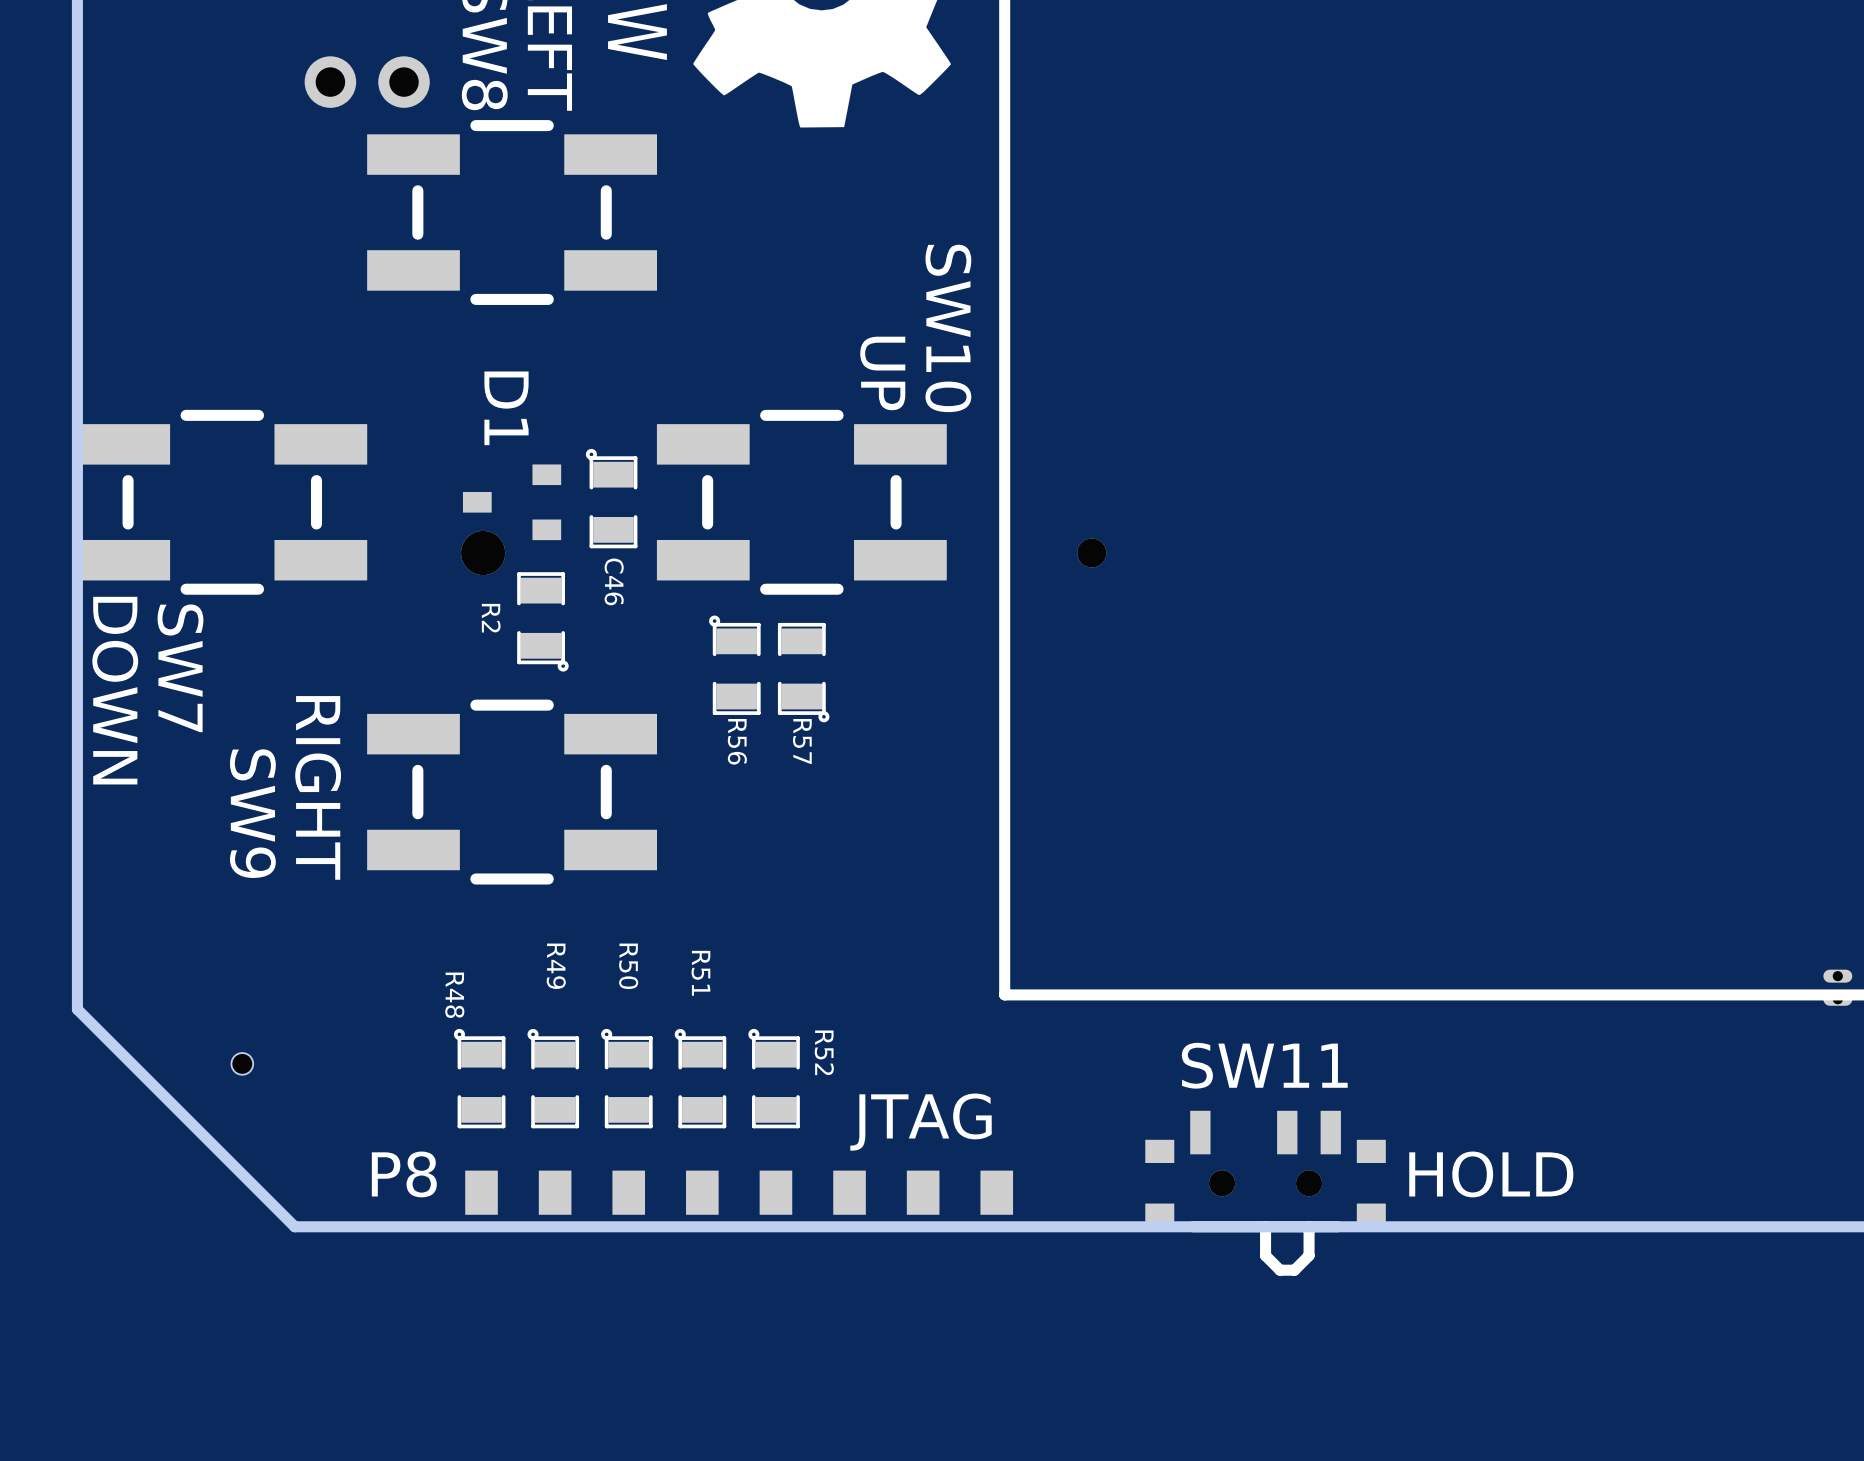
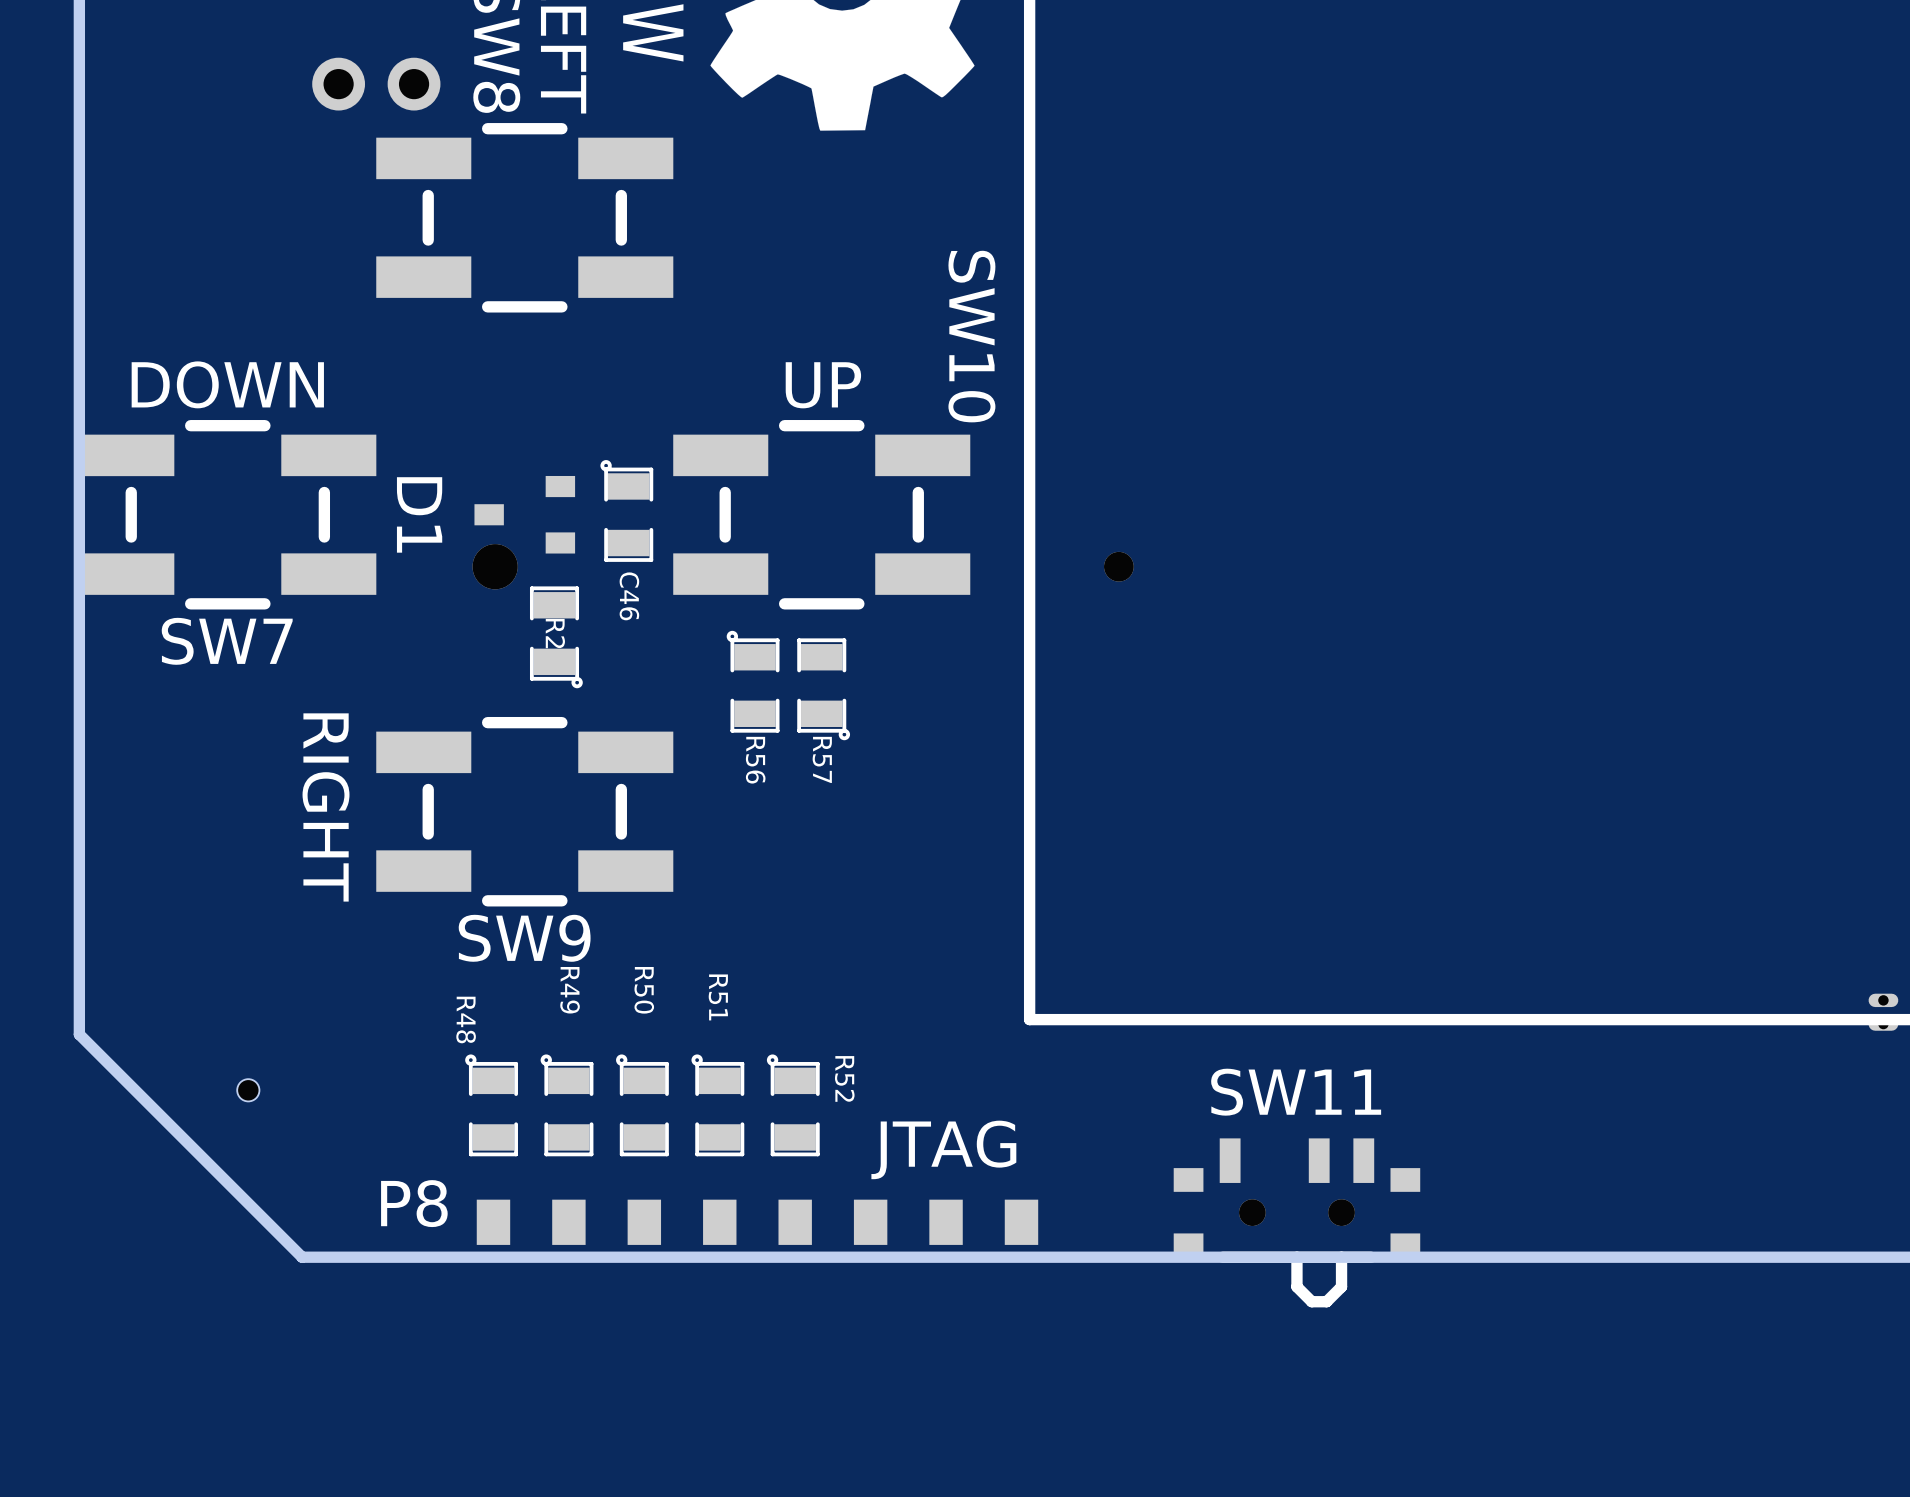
SW10 value rotation: 0° (882, 373) -> 90° counterclockwise (823, 385)
D1 name position: D1 (506, 408) -> D1 (419, 514)
R2 name position: R2 (491, 618) -> R2 (555, 633)
SW7 name rotation: 0° (180, 668) -> 90° counterclockwise (227, 641)
SW7 value rotation: 0° (115, 690) -> 90° counterclockwise (227, 384)
SW7 value position: DOWN (115, 690) -> DOWN (227, 384)
SW9 name rotation: 0° (252, 813) -> 90° counterclockwise (524, 938)
SW9 name position: SW9 (252, 813) -> SW9 (524, 938)
SW11 value: HOLD (1491, 1174) -> none

